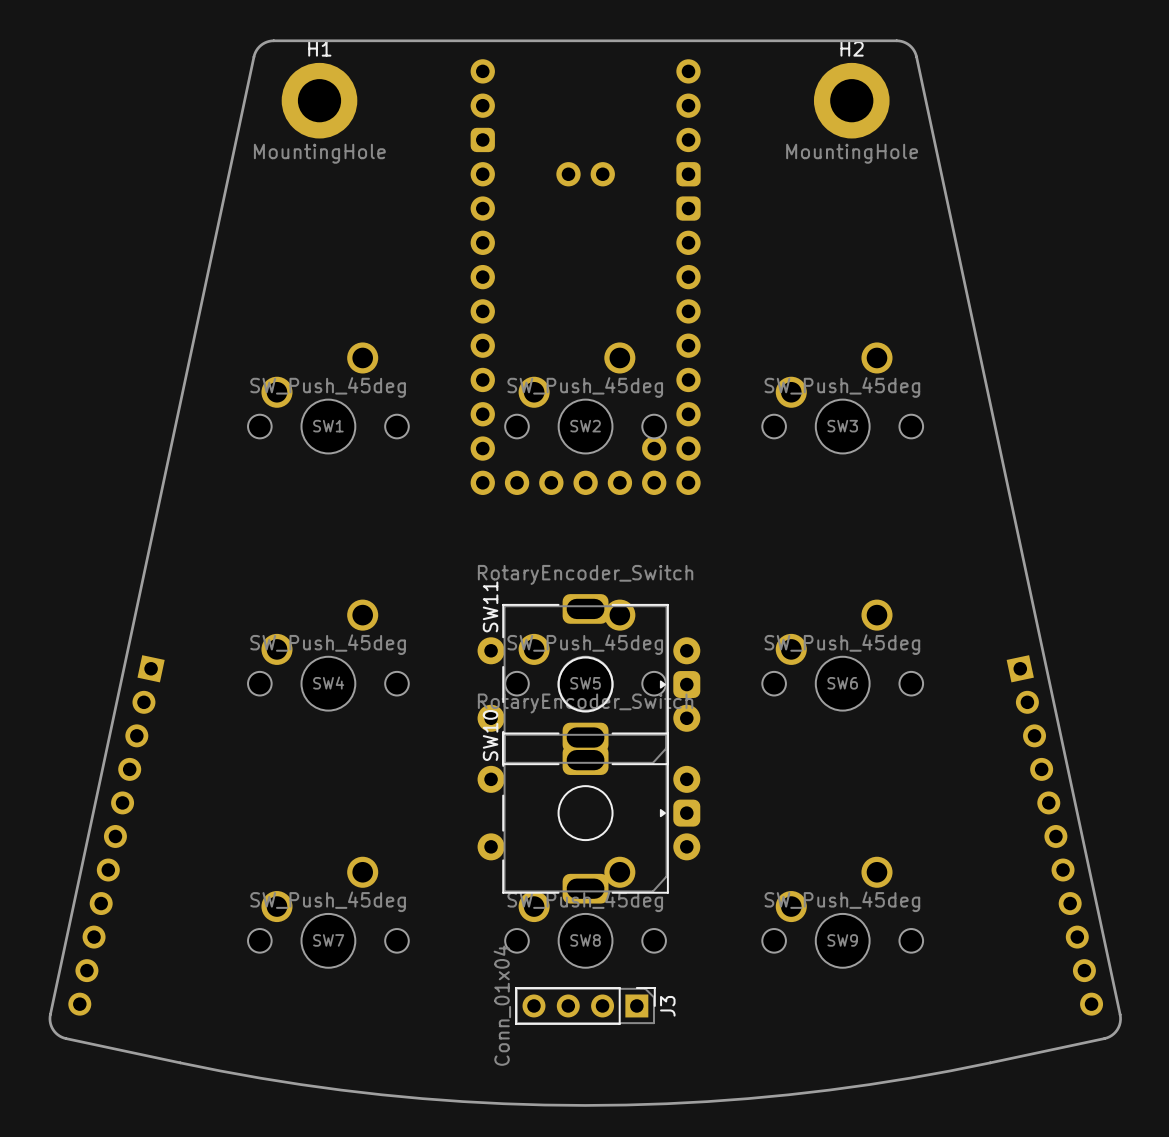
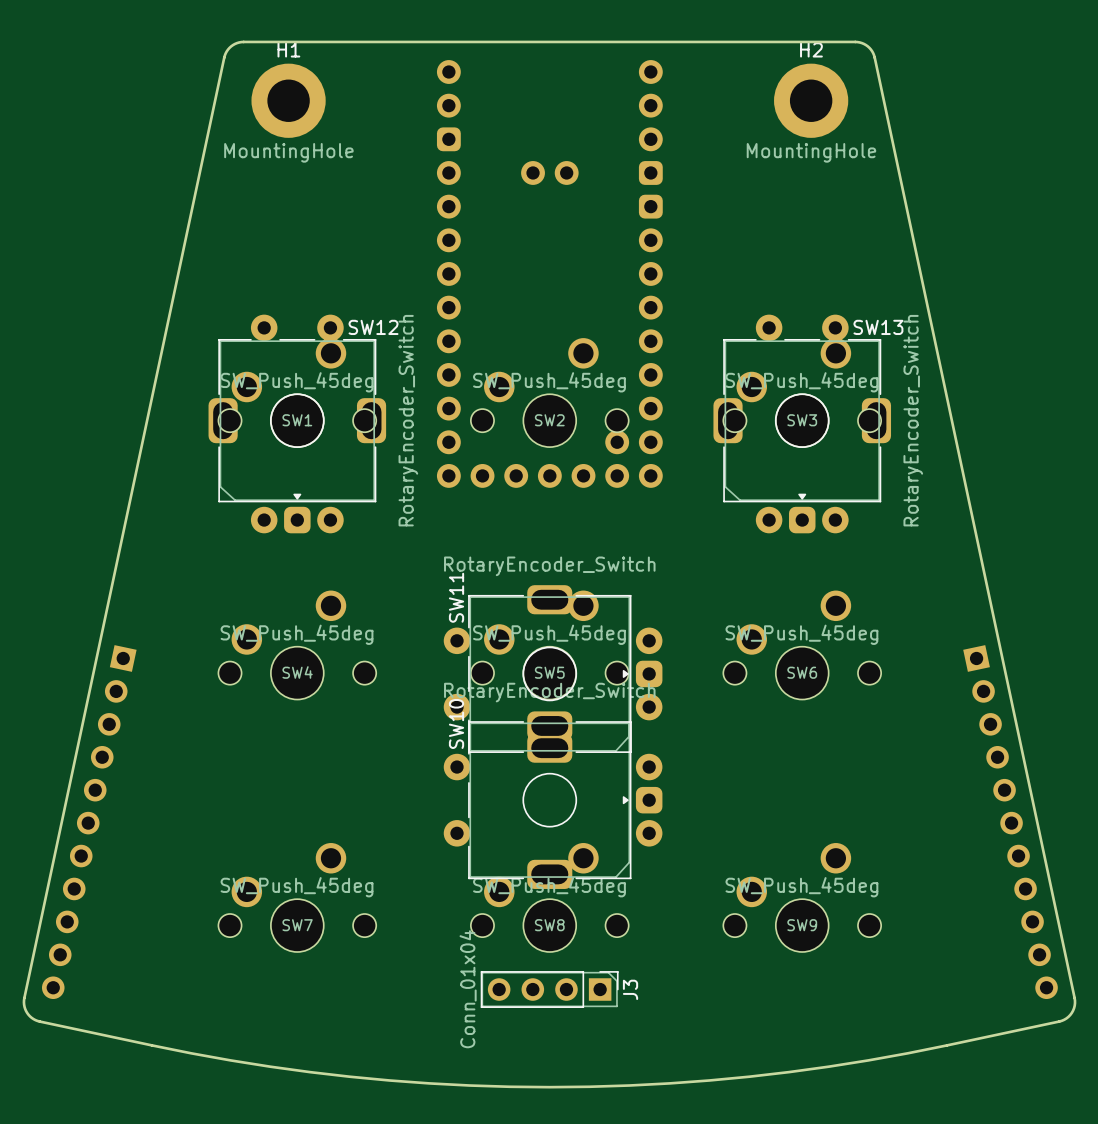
SW12: none -> RotaryEncoder_Switch (297, 423)
SW13: none -> RotaryEncoder_Switch (802, 423)

